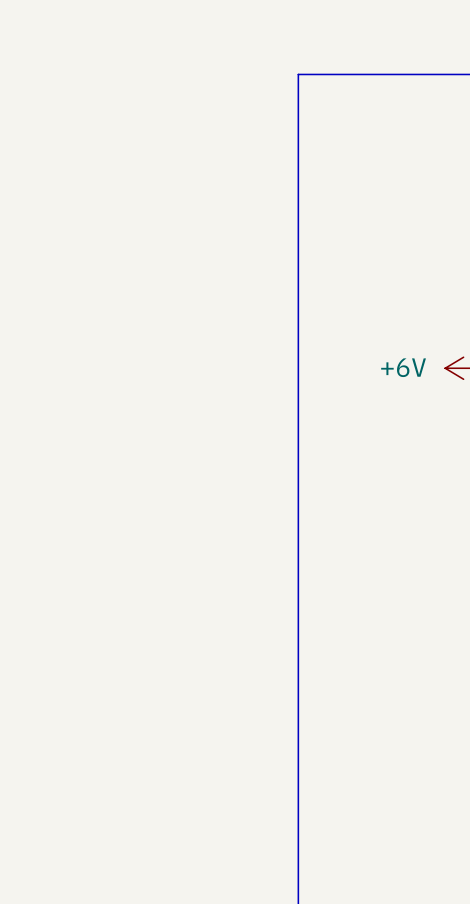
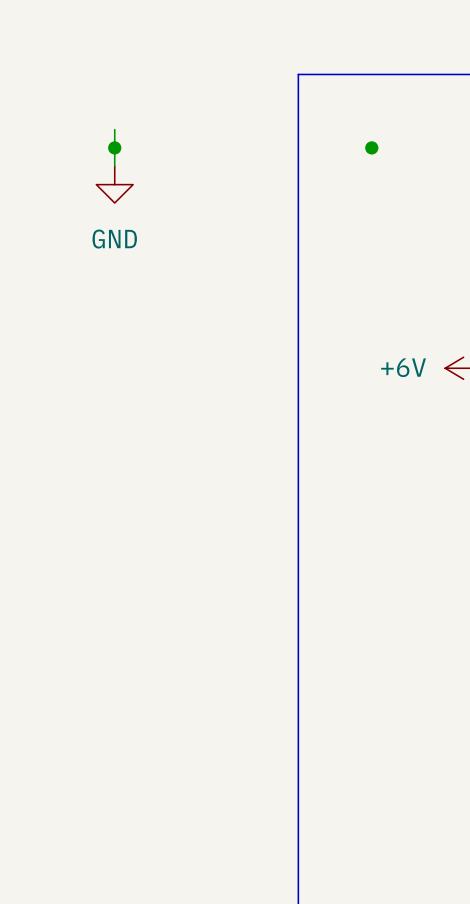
wire: none -> (114, 129) (114, 166)
junction: none -> (114, 147)
junction: none -> (371, 147)
power symbol: none -> GND (114, 184)

